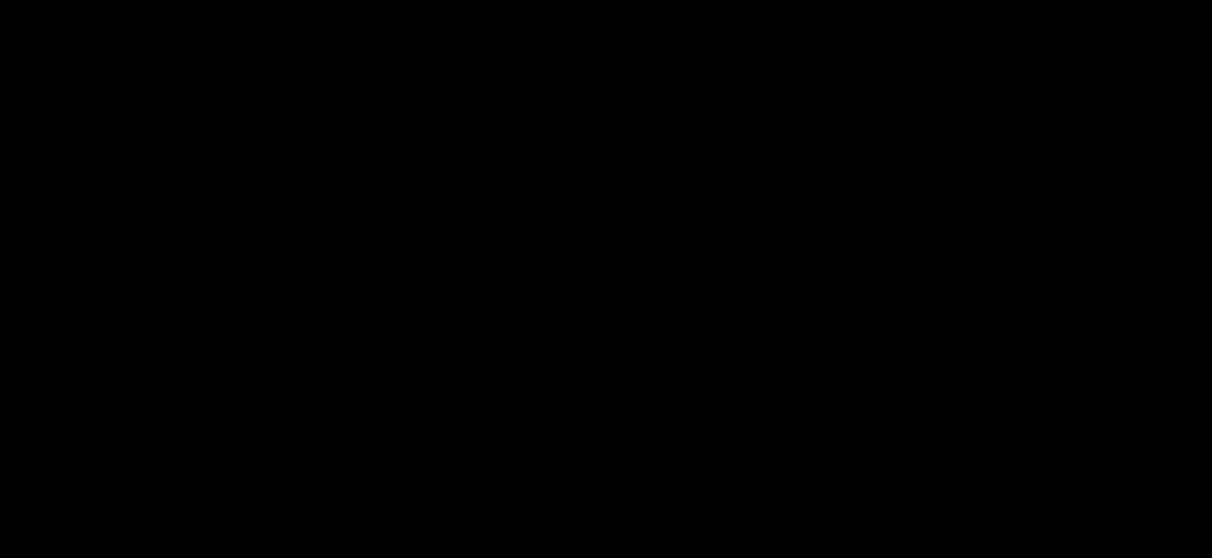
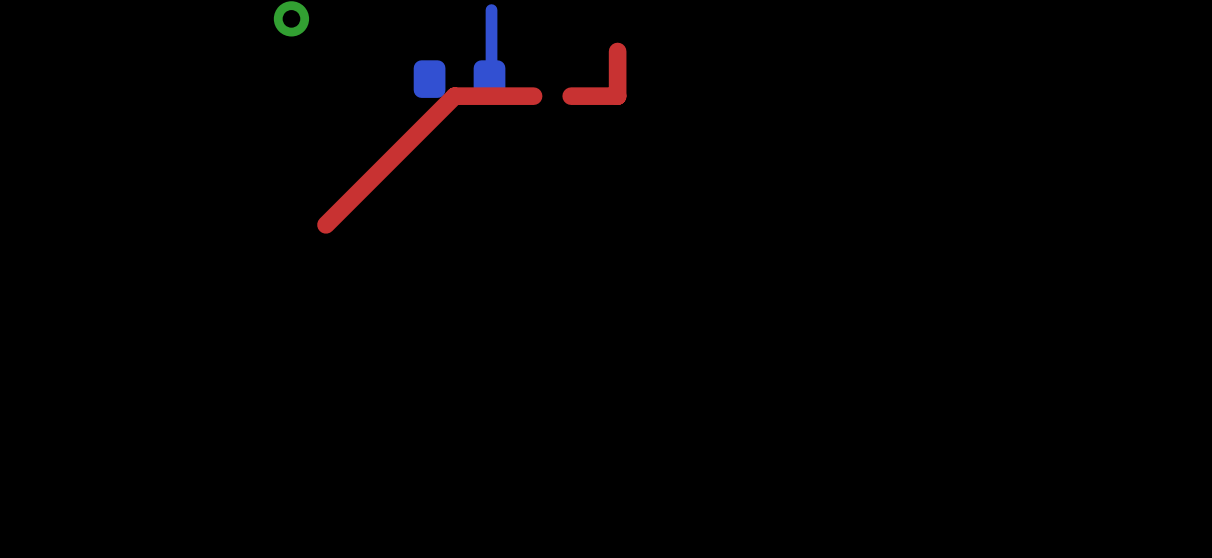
bottom track: none -> (491, 10) (491, 77) (489, 79)
via: none -> (291, 18)
top track: none -> (617, 51) (617, 96) (571, 96)
part: none -> (459, 79)
top track: none -> (533, 96) (454, 96) (325, 224)

